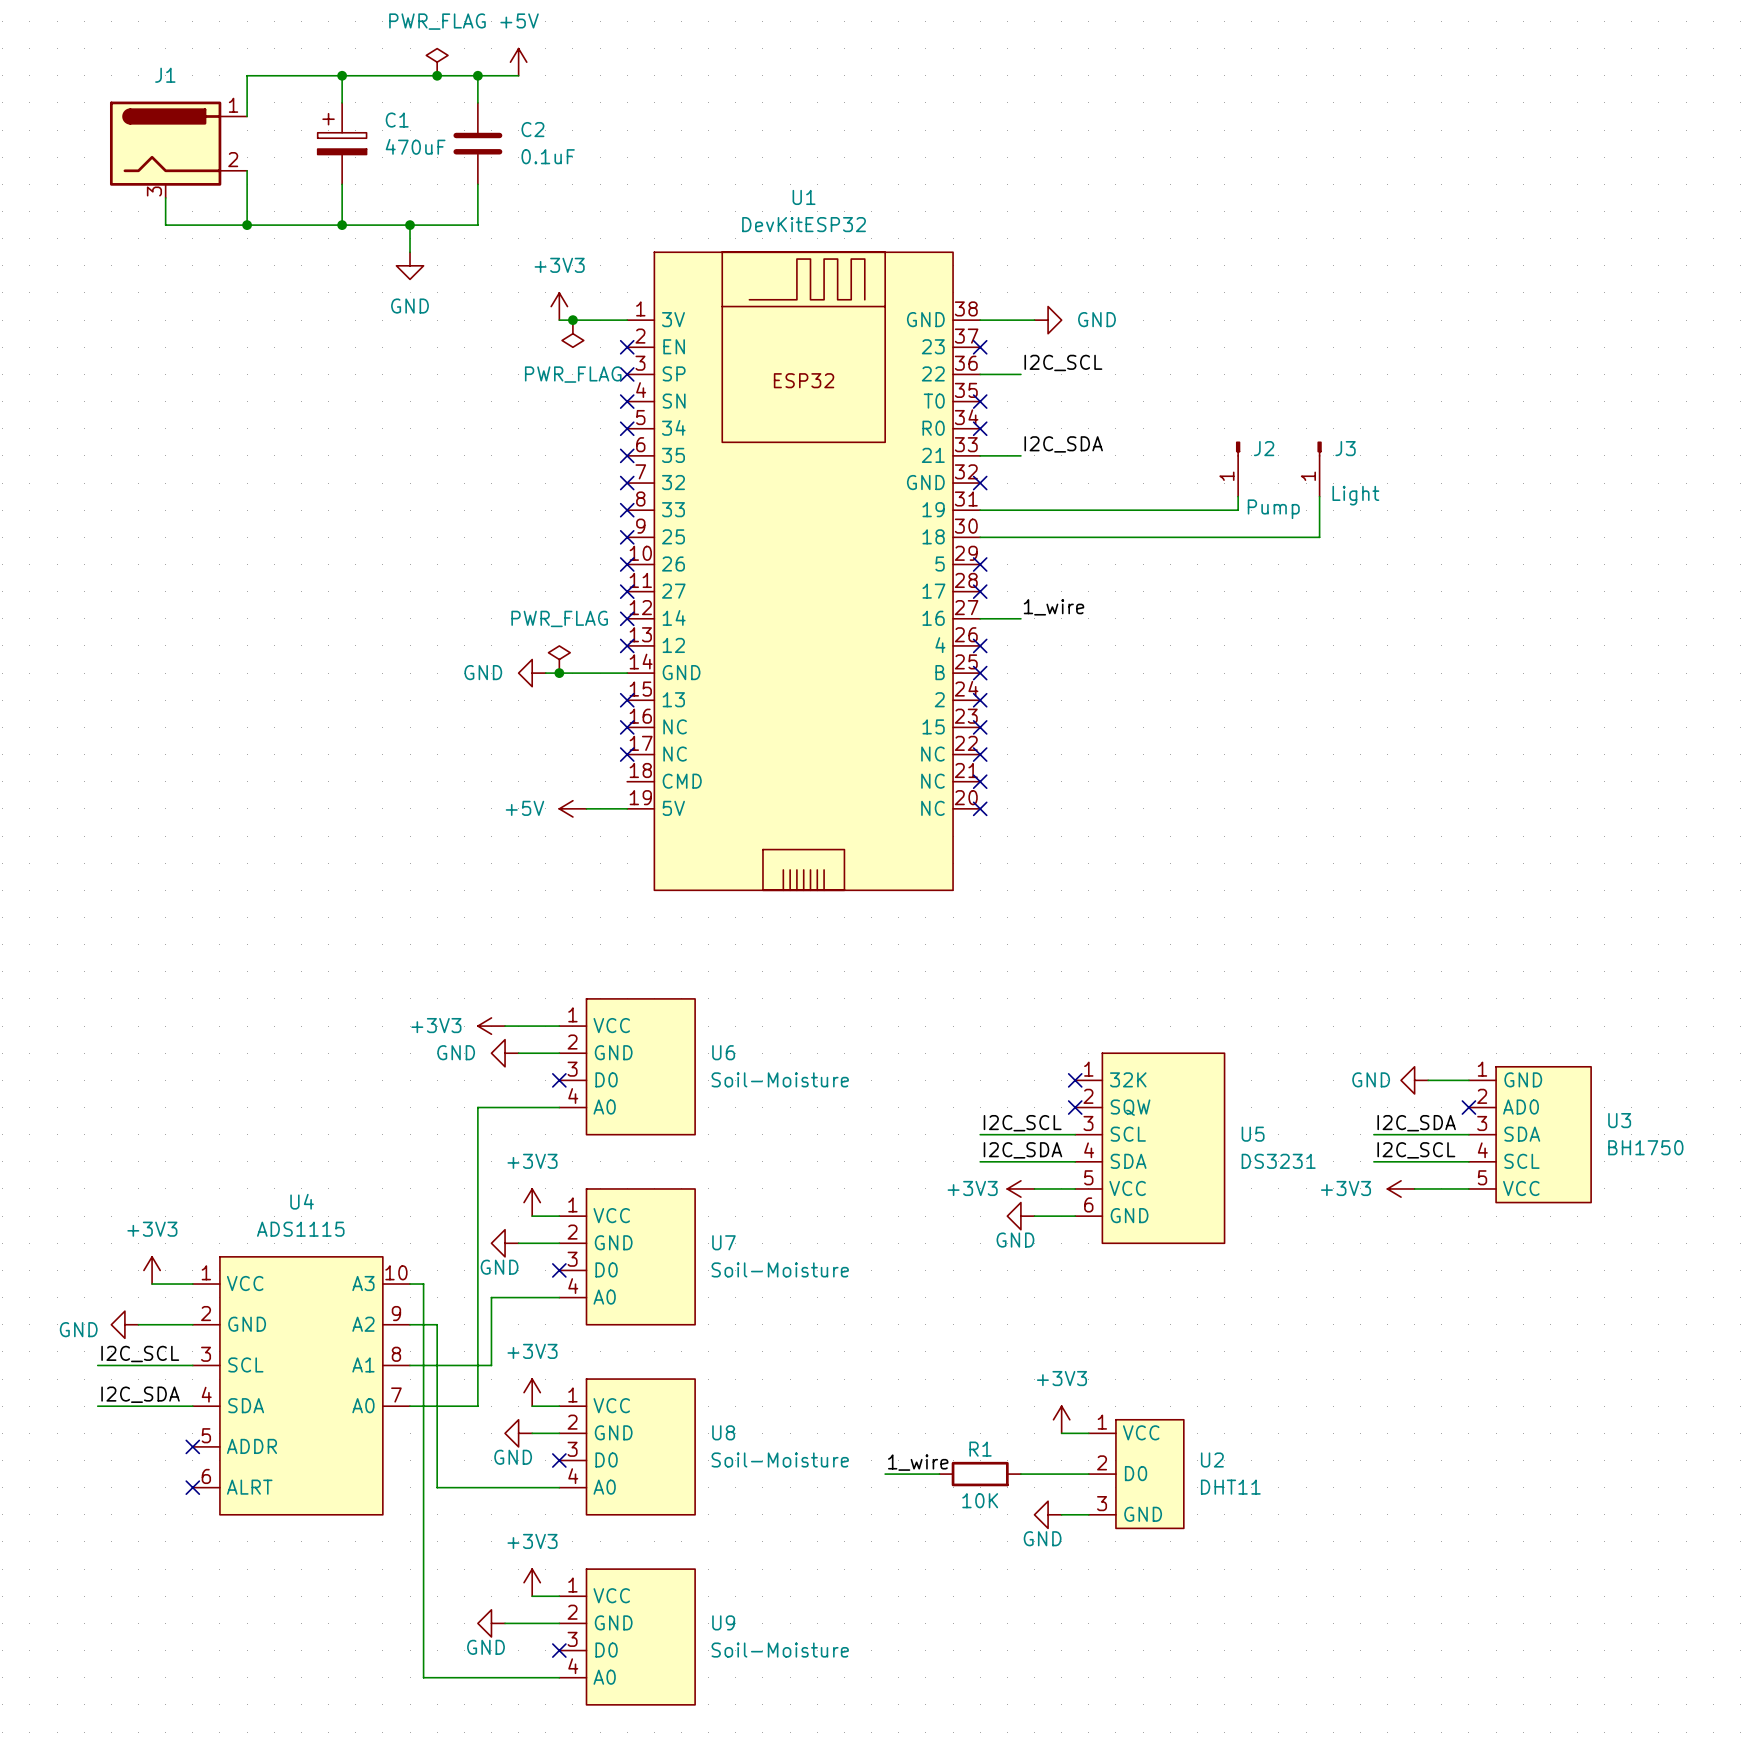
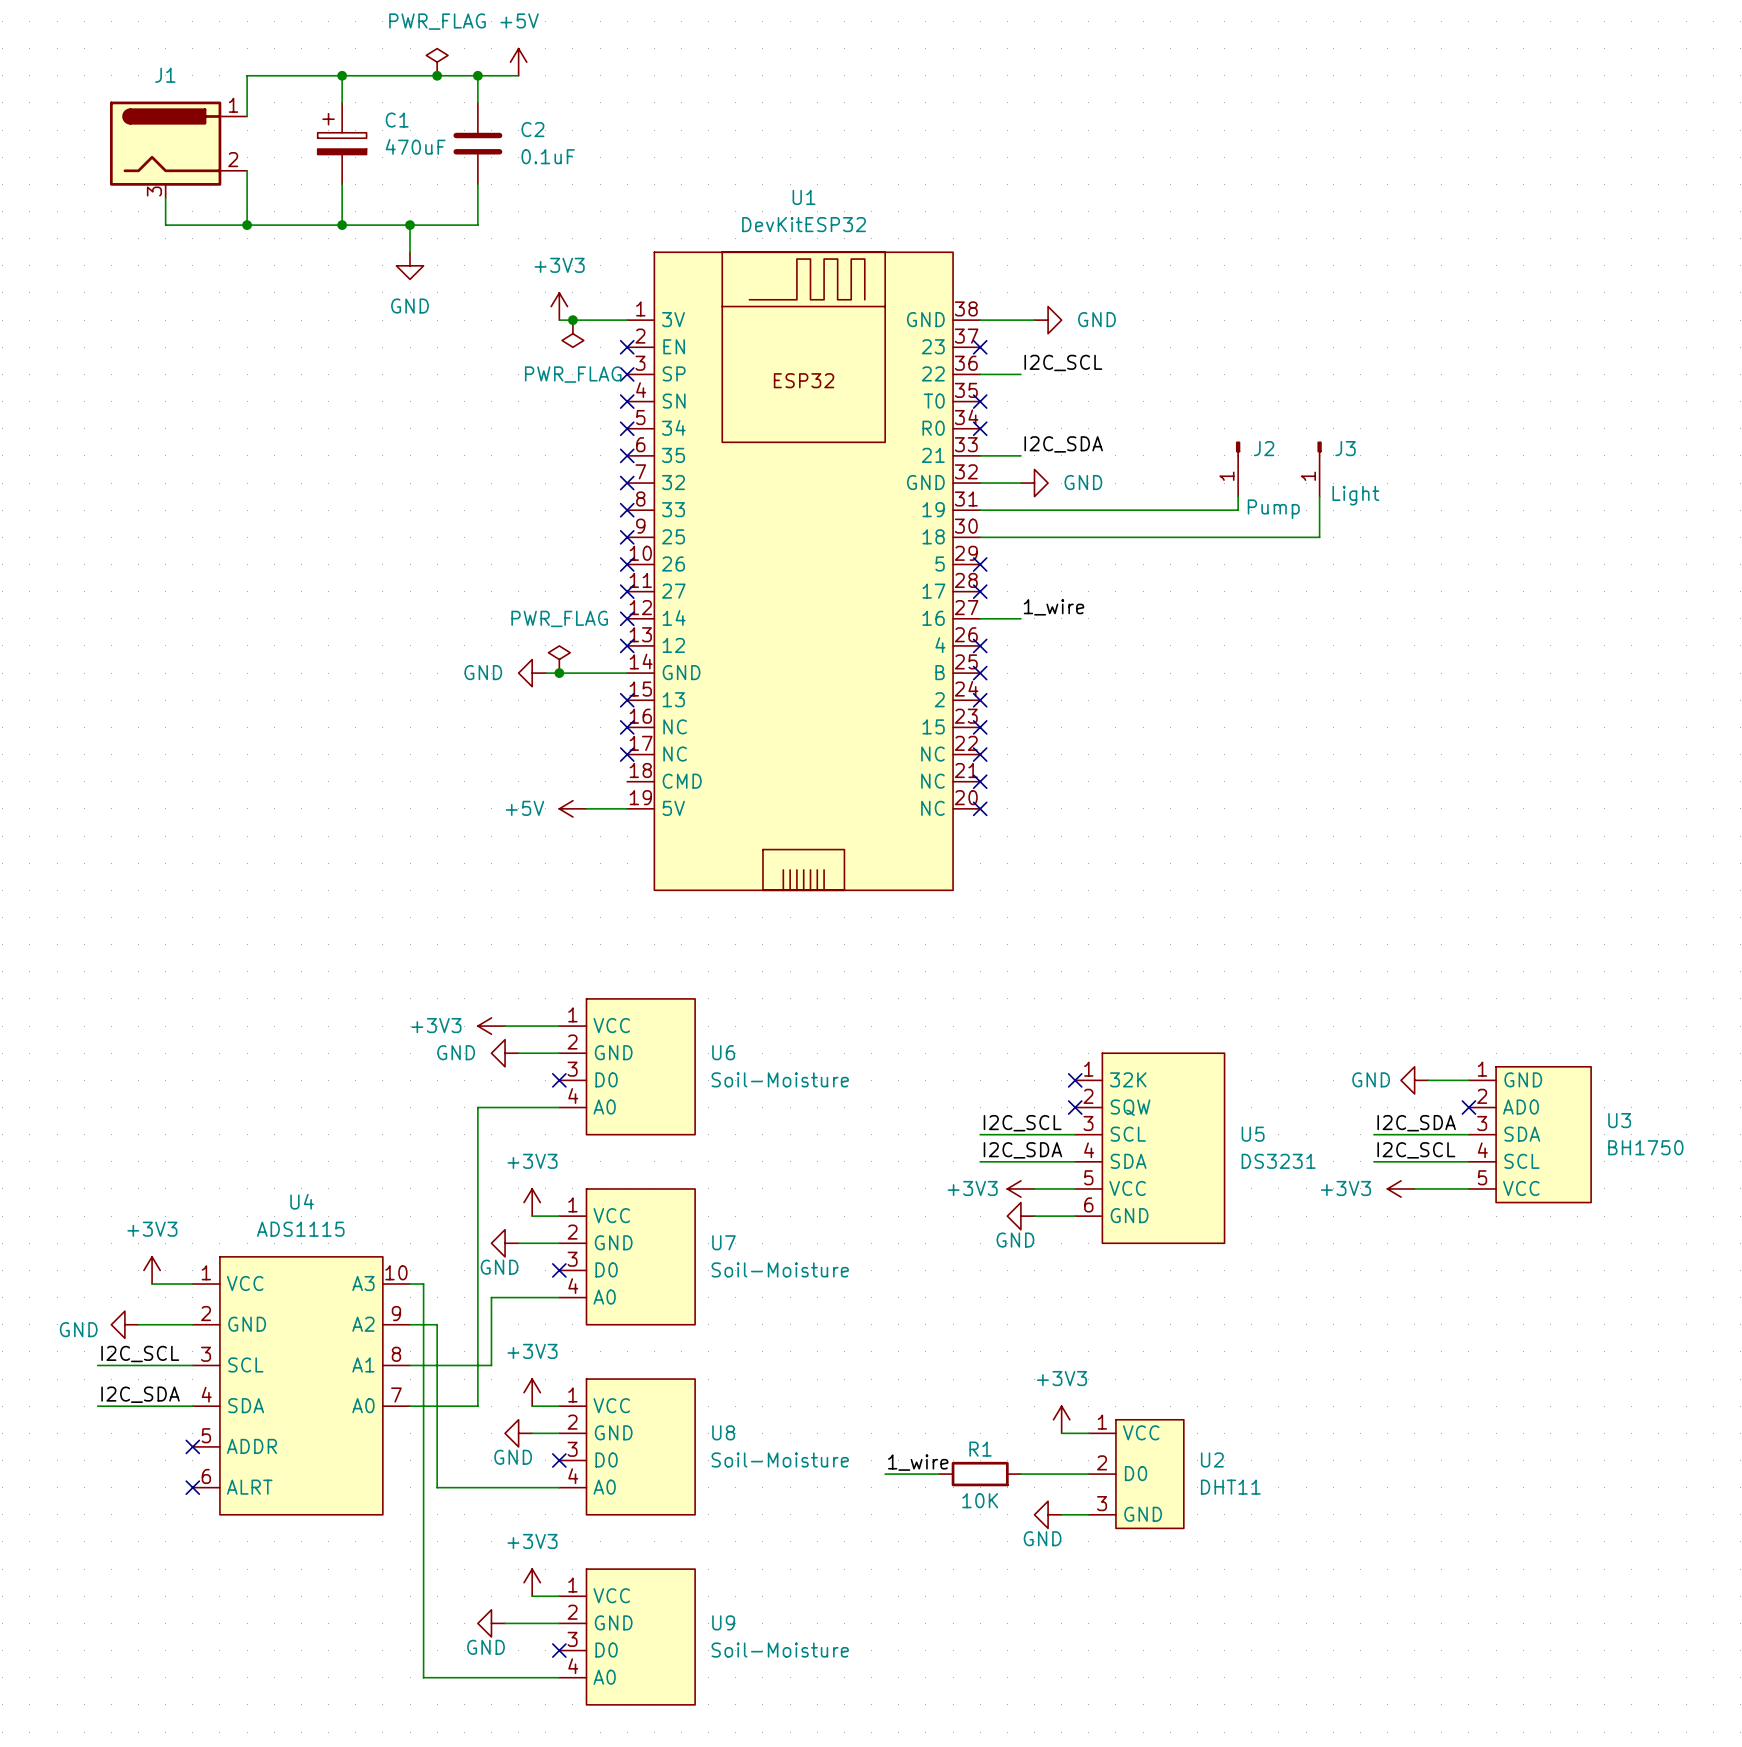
wire: none -> (980, 483) (1020, 483)
no-connect mark: (980, 483) -> none
power symbol: none -> GND (1034, 483)

